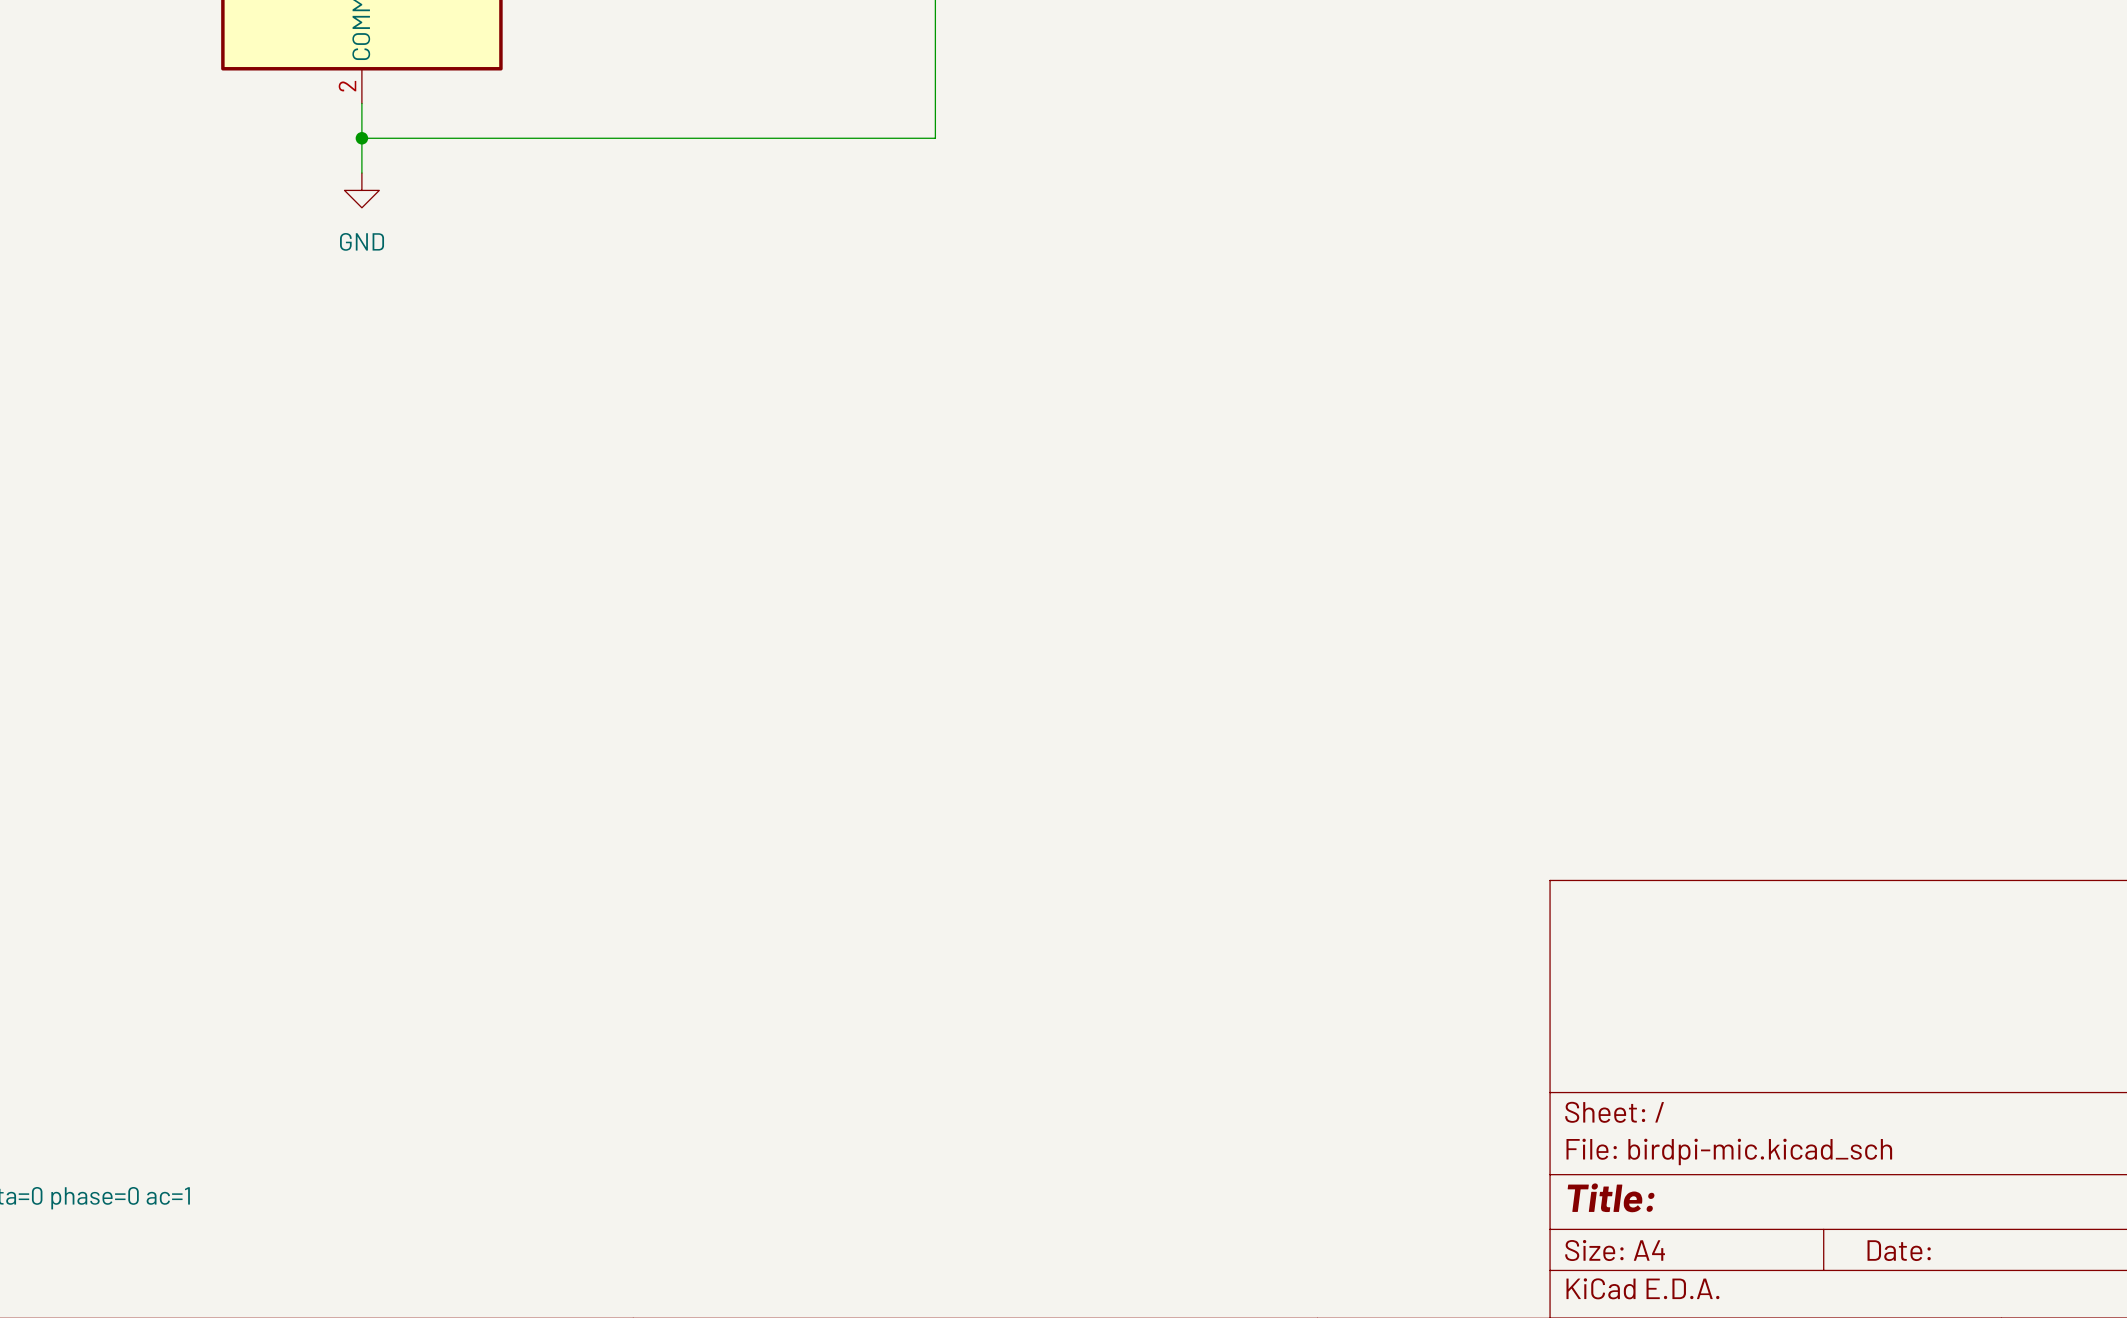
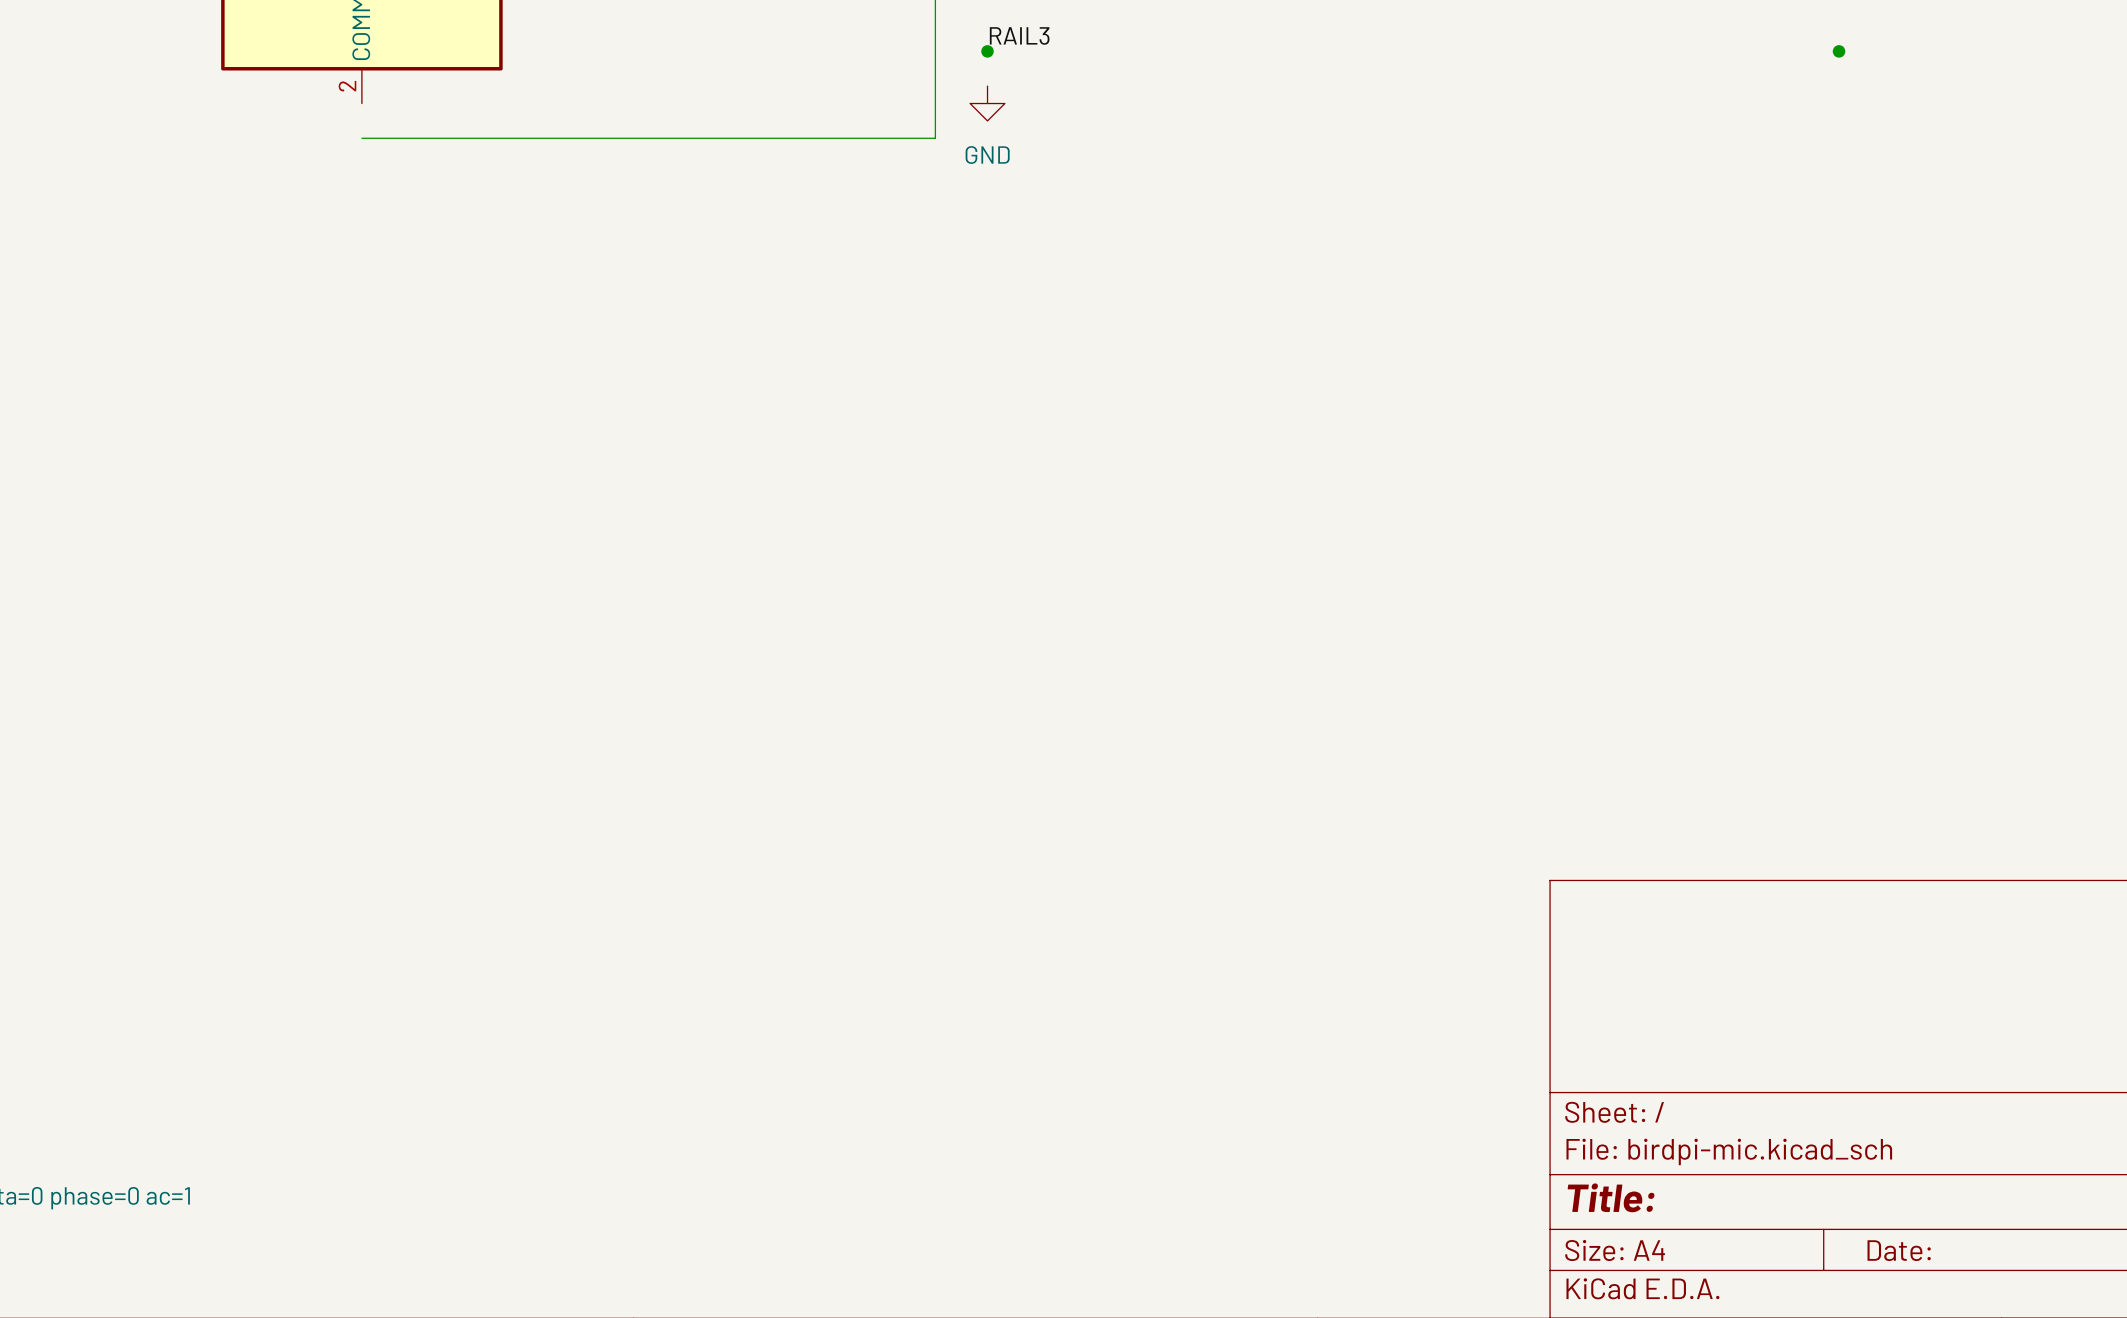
label: none -> RAIL3 (1019, 35)
junction: none -> (987, 51)
junction: none -> (1839, 51)
wire: (361, 103) (361, 173) -> none
power symbol: none -> GND (987, 103)
junction: (361, 138) -> none
power symbol: GND (361, 190) -> none

